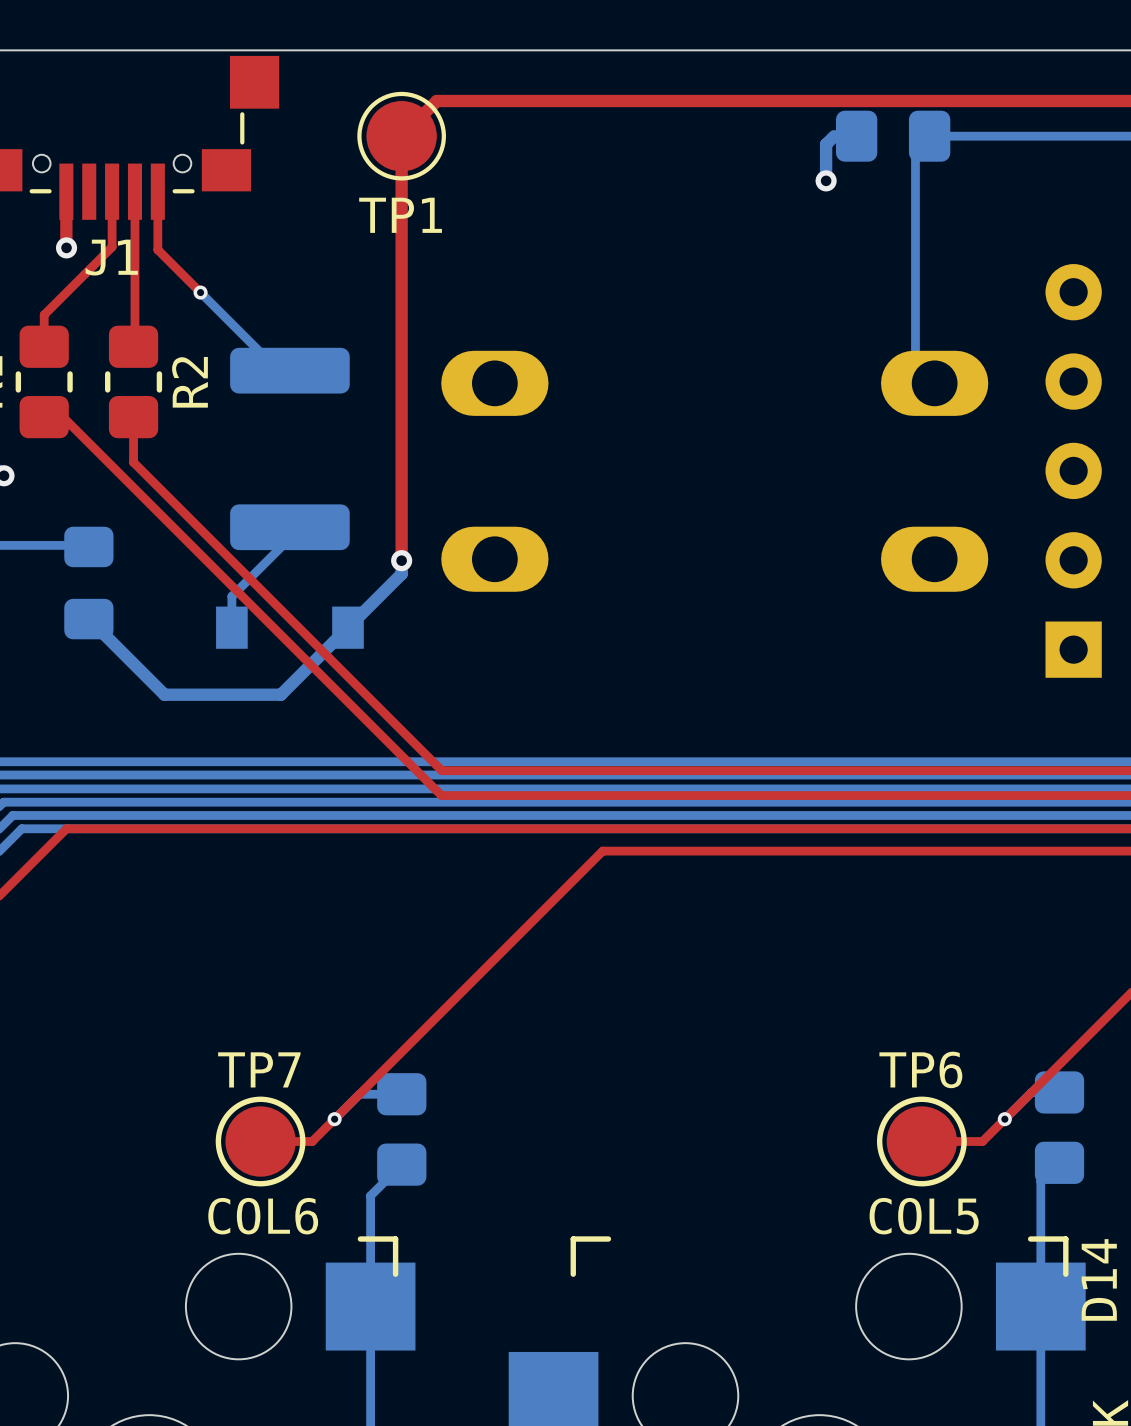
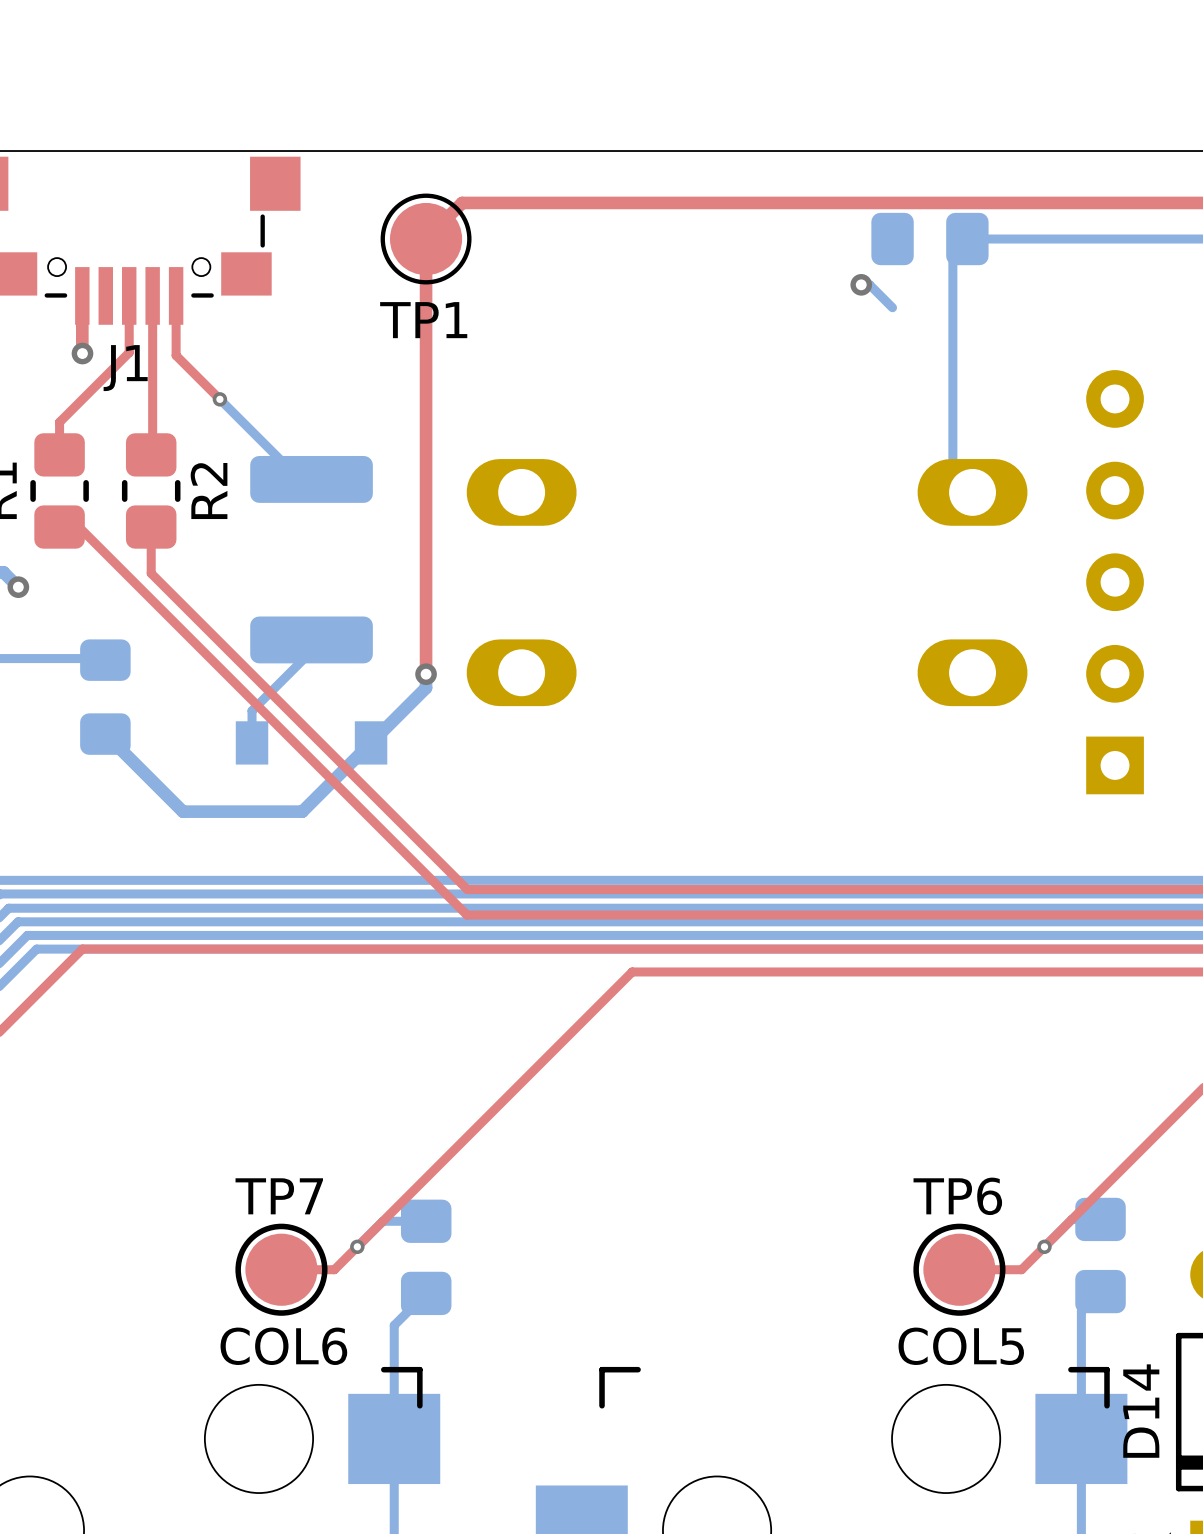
bottom track: (834, 136) (826, 144) (826, 180) -> (892, 307) (869, 284) (861, 284)

